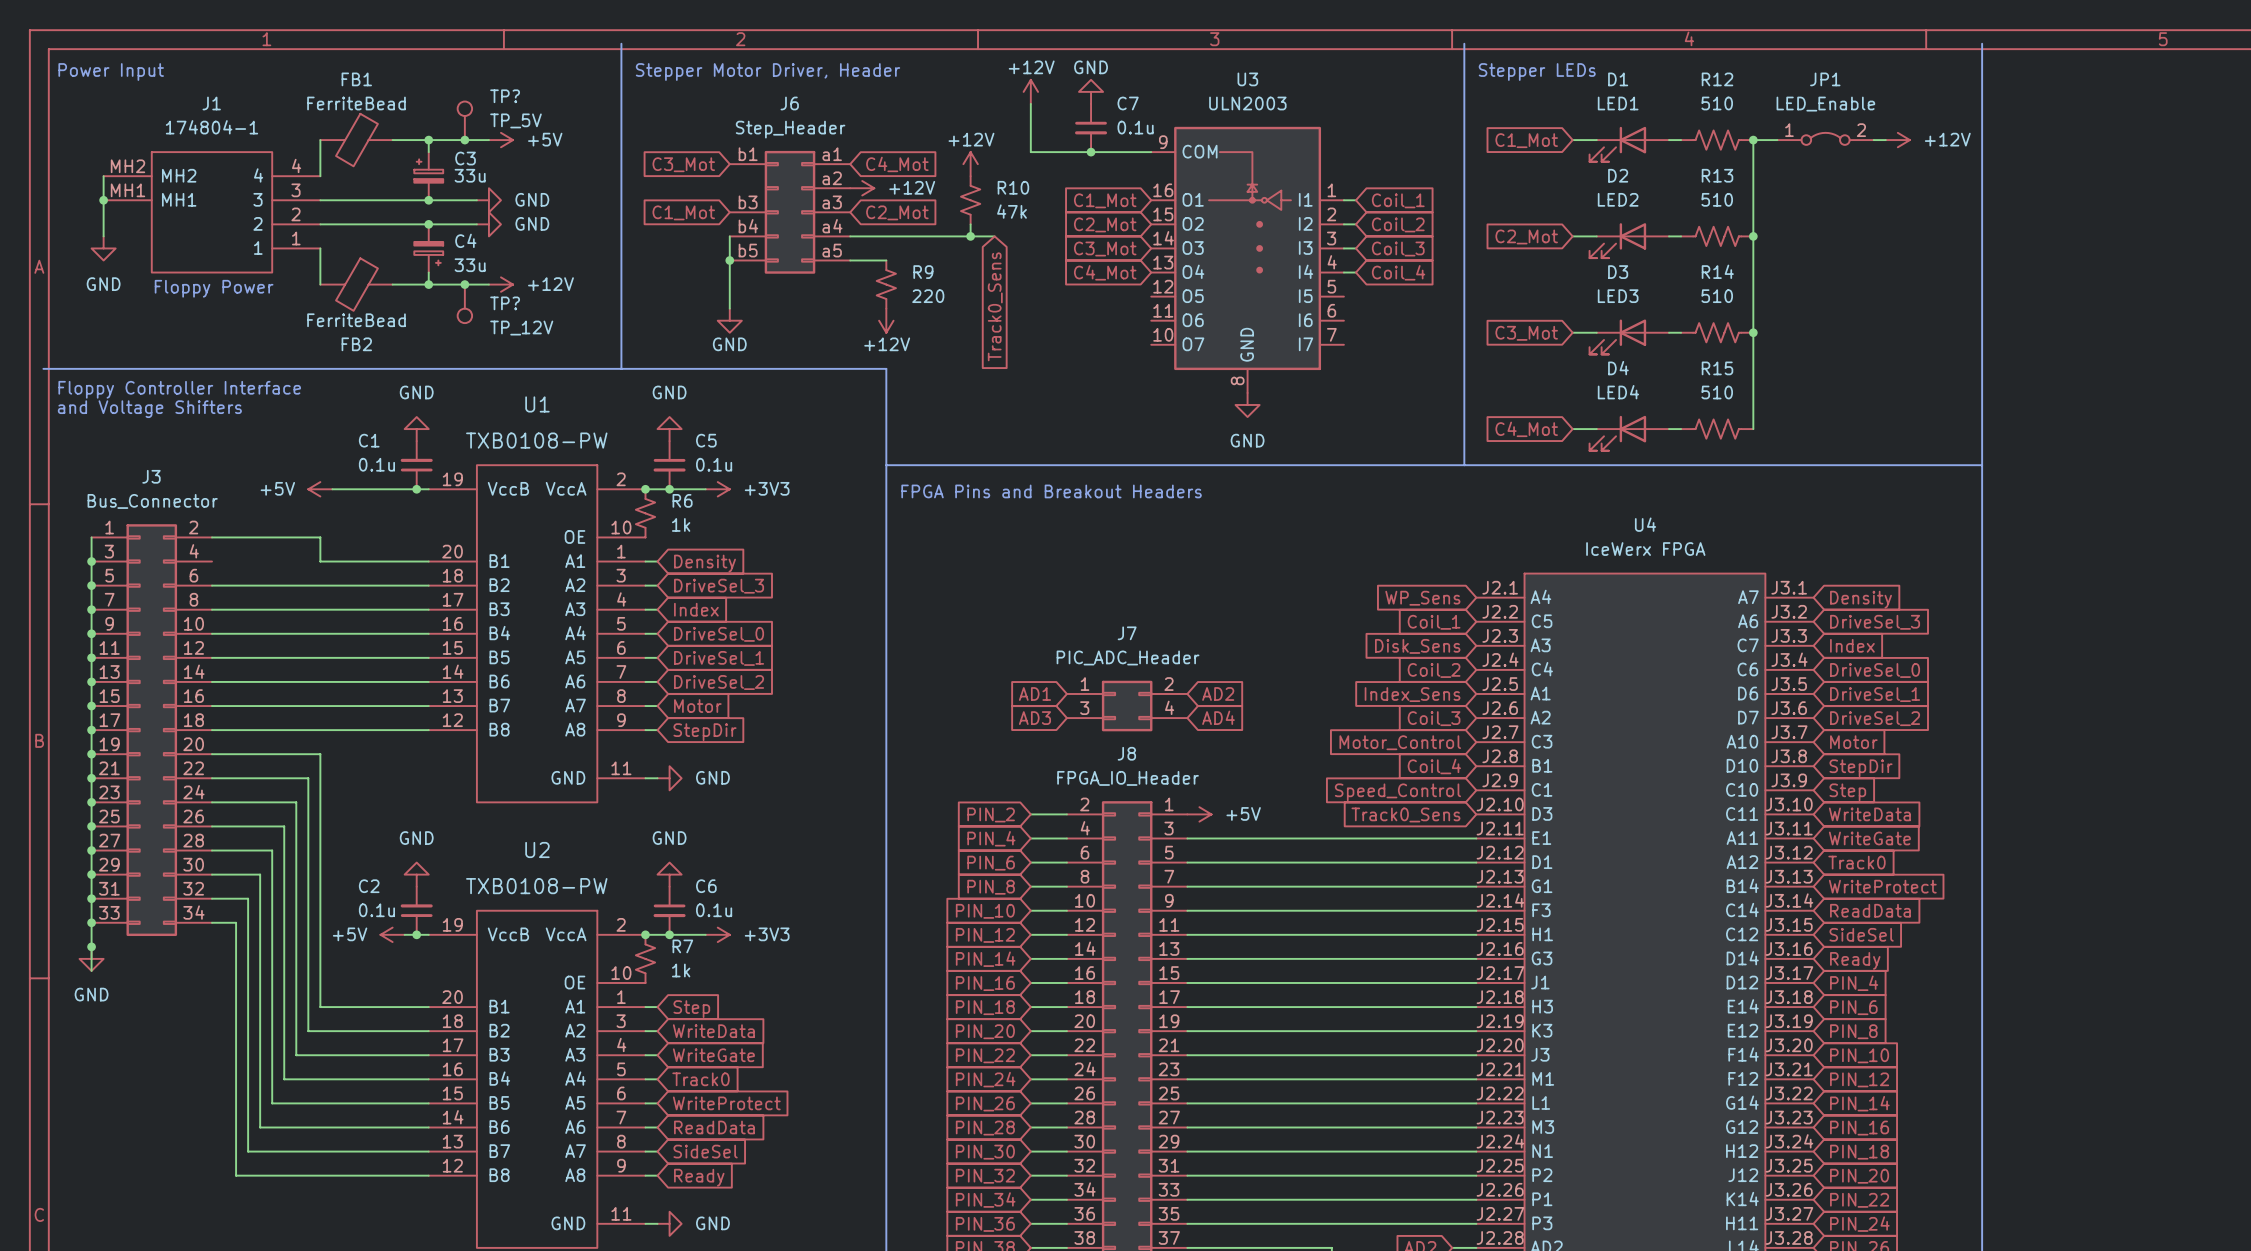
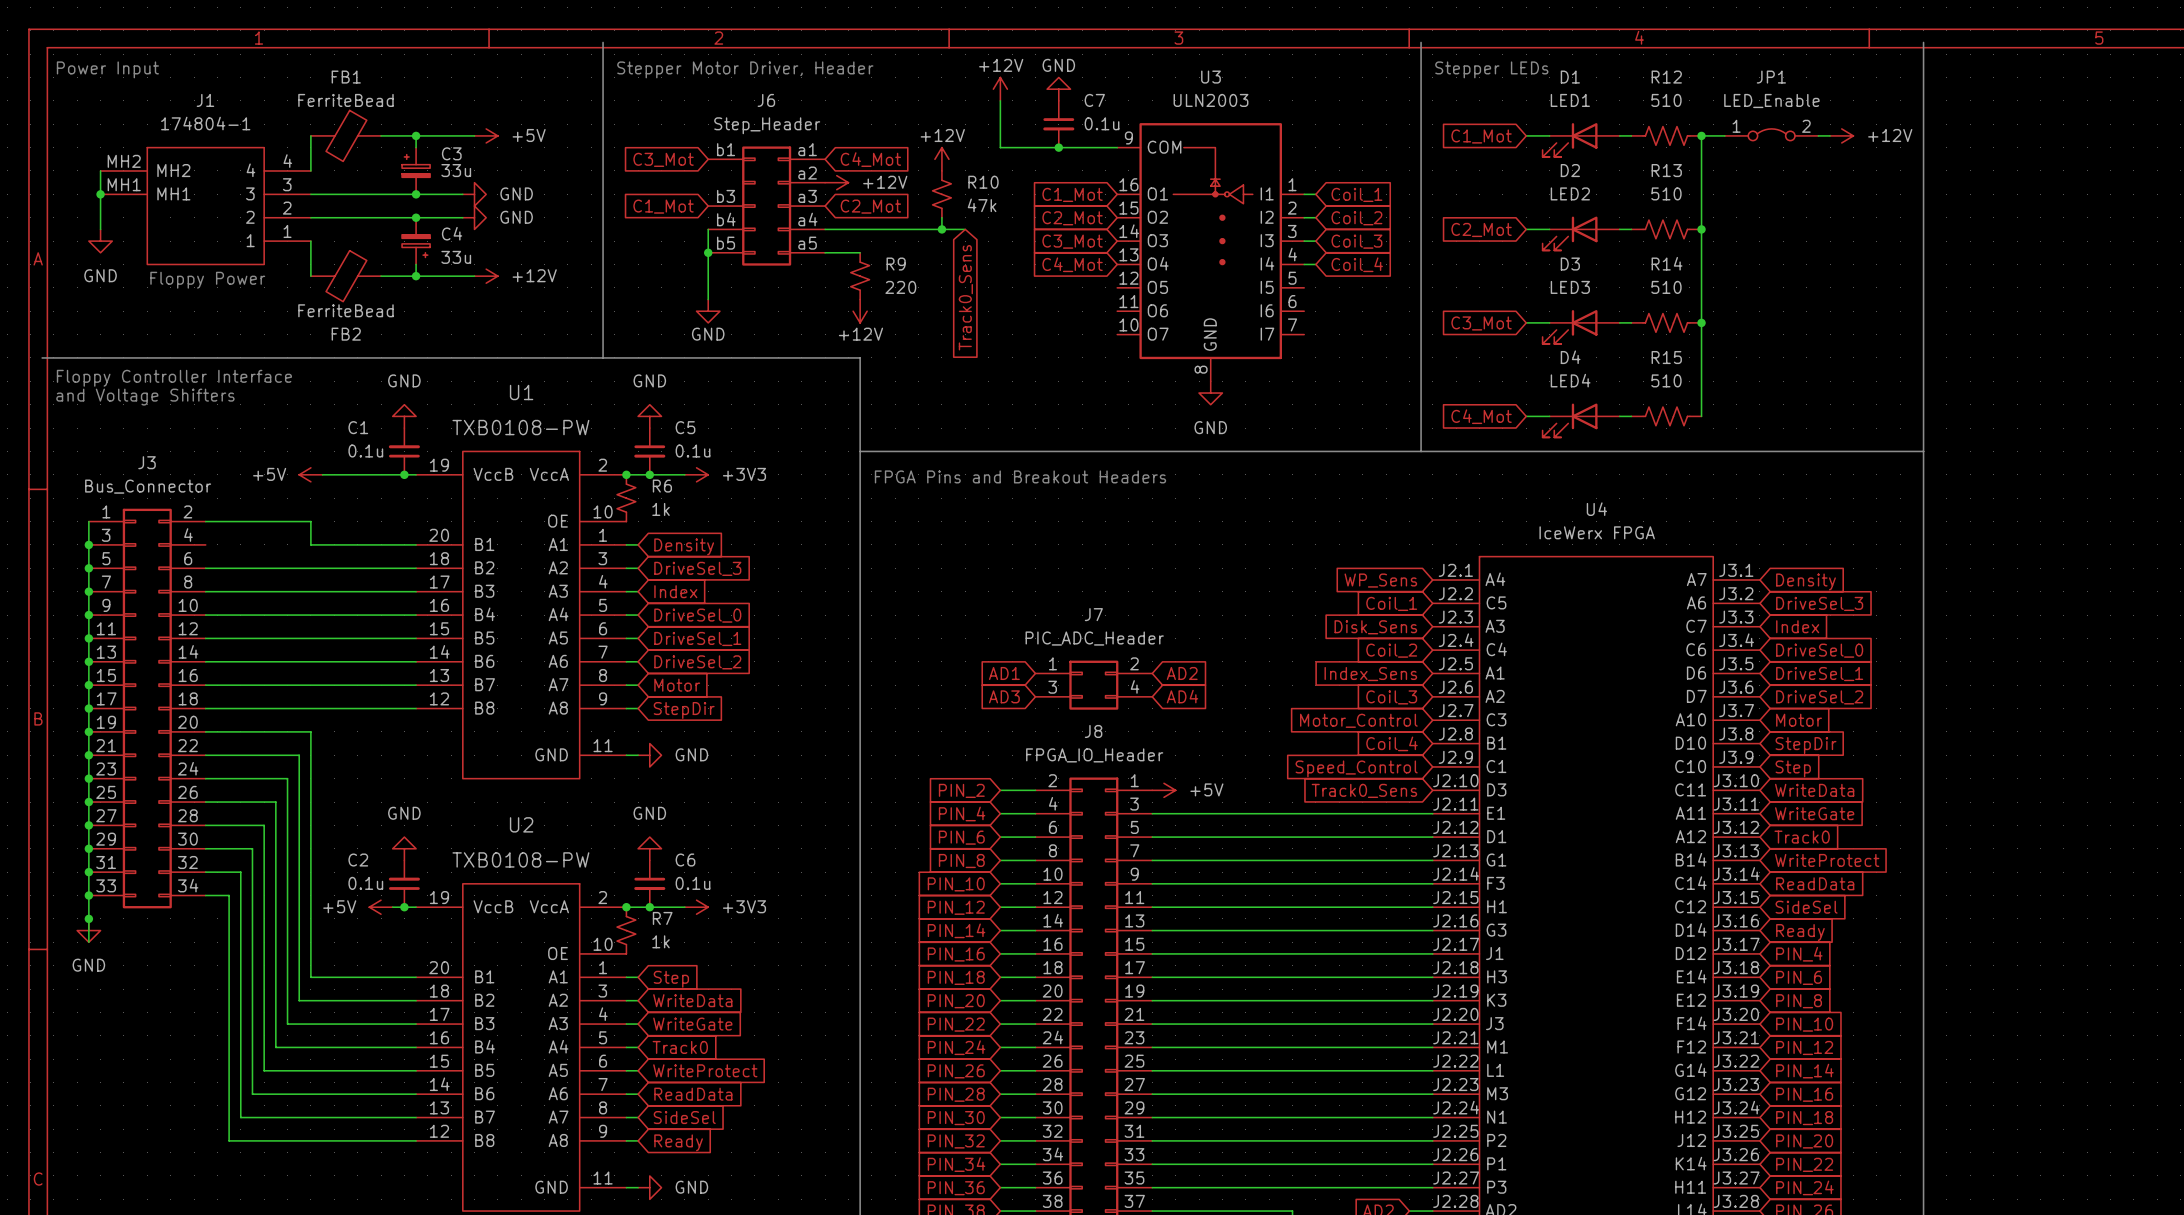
TP?: TP_5V (464, 120) -> none
junction: (464, 140) -> none
junction: (464, 284) -> none
TP?: TP_12V (464, 303) -> none

